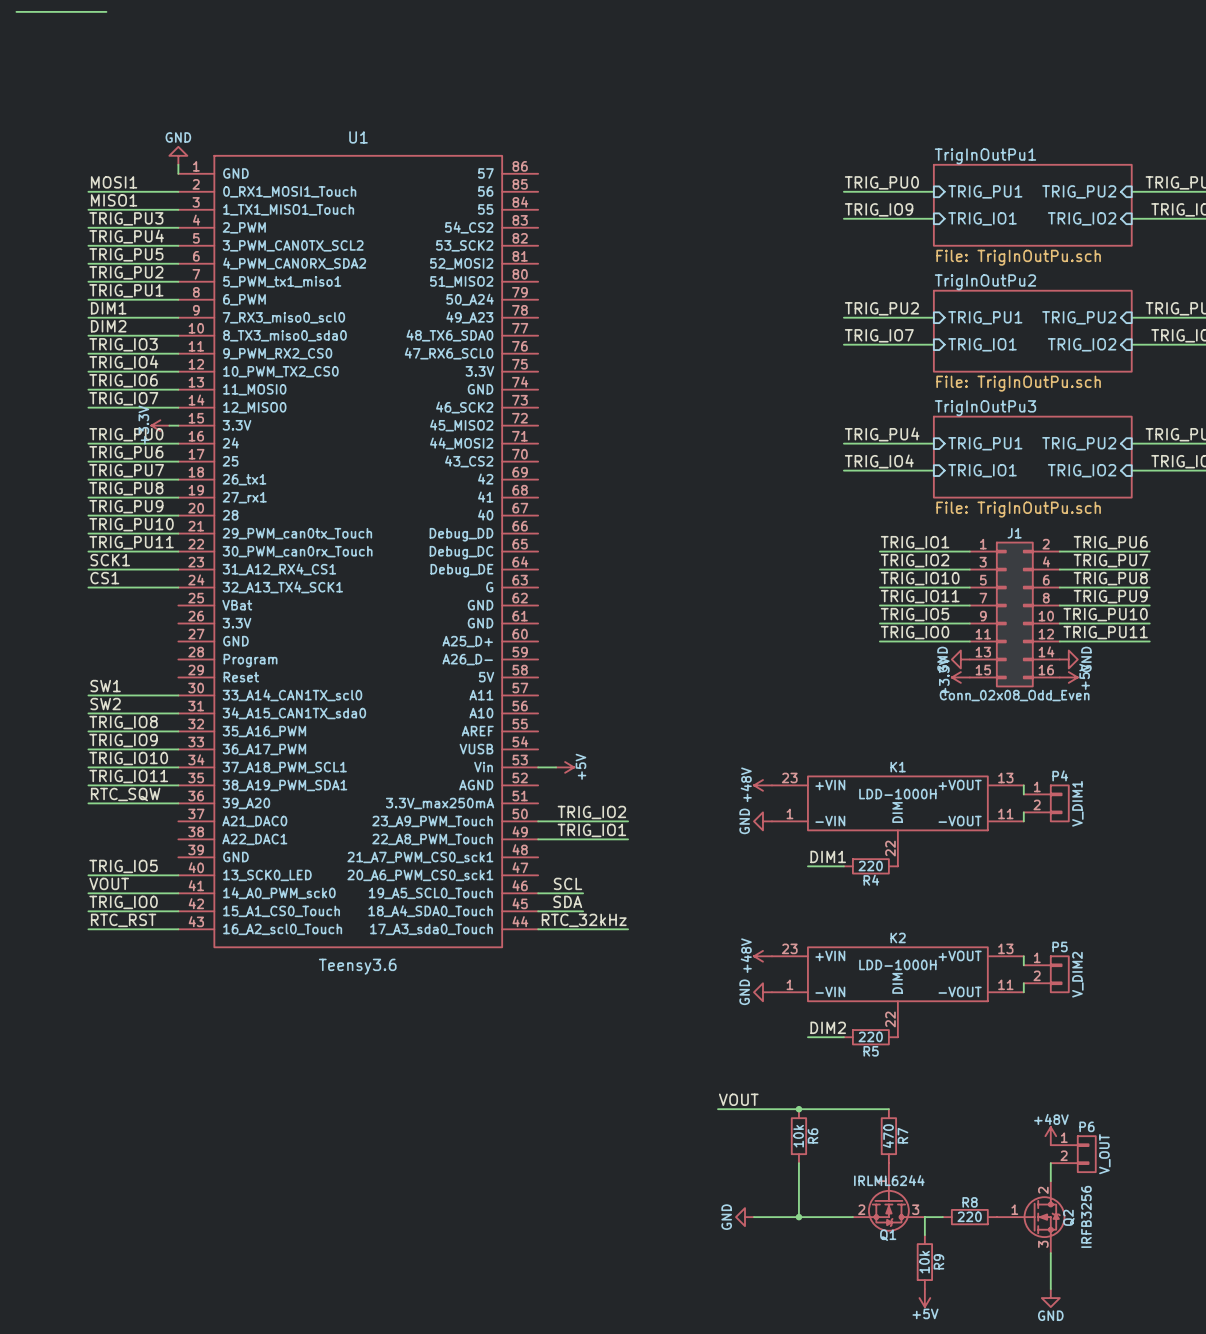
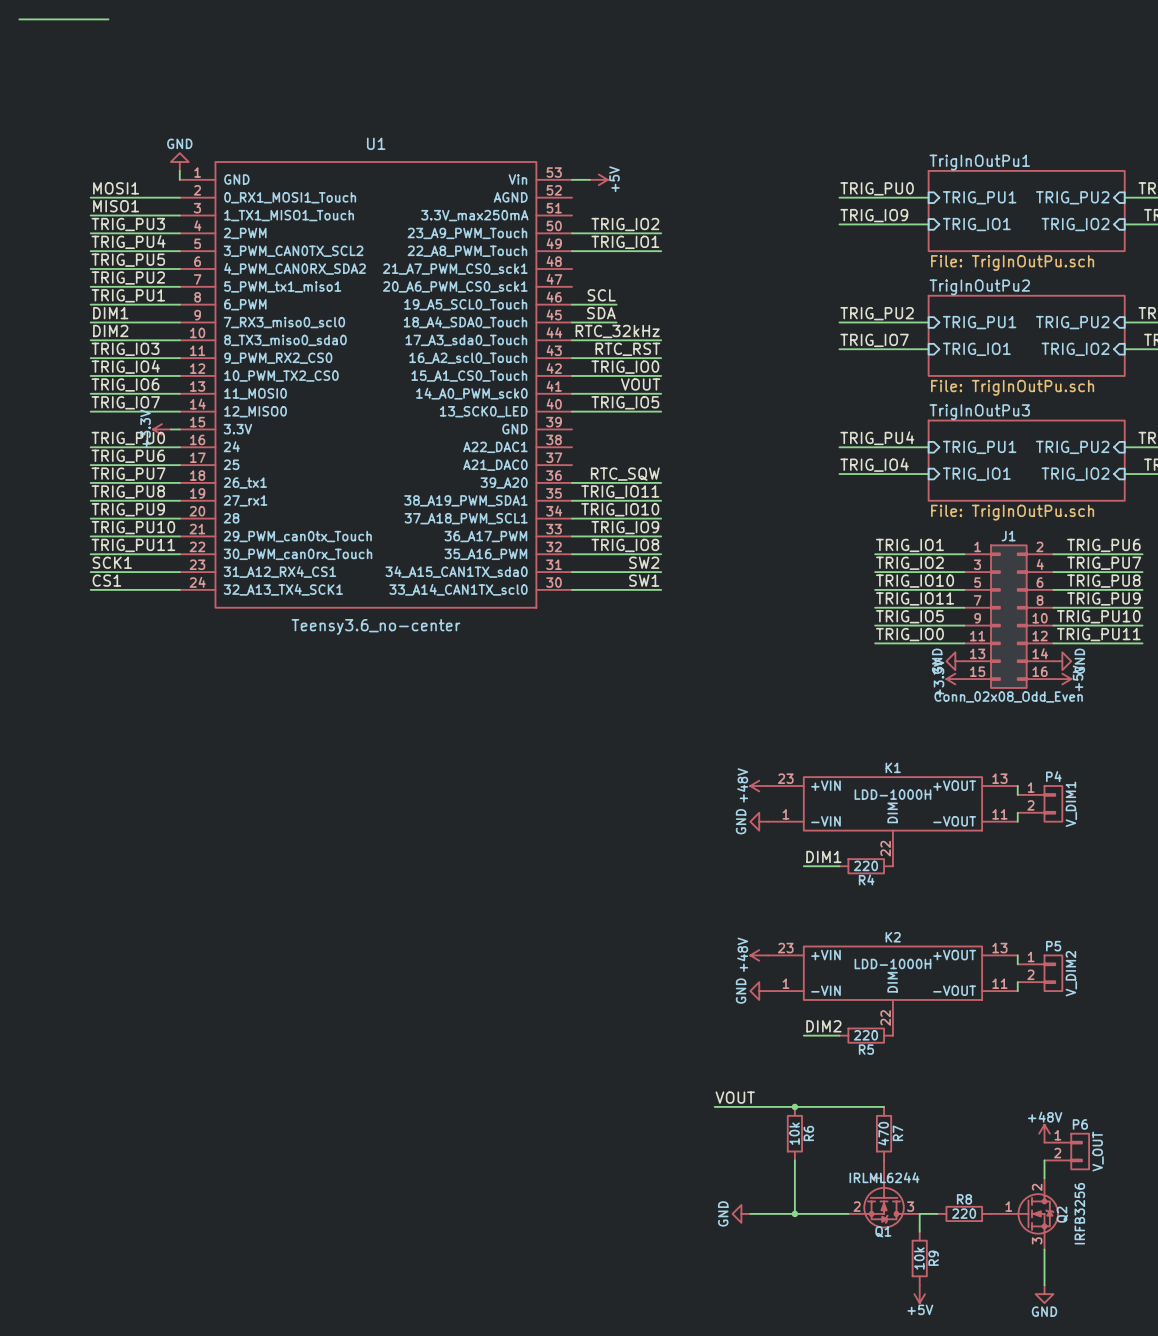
U1 name position: U1 (358, 137) -> U1 (376, 143)
U1 symbol: [178, 155, 539, 948] -> [179, 162, 573, 608]
wire: none -> (572, 179) (589, 179)
power symbol: none -> +5V (598, 179)
label: none -> TRIG_IO2 (625, 224)
wire: none -> (572, 233) (661, 233)
label: none -> TRIG_IO1 (625, 242)
wire: none -> (572, 251) (661, 251)
label: none -> SCL (601, 295)
wire: none -> (572, 304) (616, 304)
label: none -> SDA (601, 313)
wire: none -> (572, 322) (616, 322)
label: none -> RTC_32kHz (617, 331)
wire: none -> (572, 340) (661, 340)
label: none -> RTC_RST (627, 349)
wire: none -> (572, 358) (661, 358)
label: none -> TRIG_IO0 (625, 367)
wire: none -> (572, 375) (661, 375)
label: none -> VOUT (640, 384)
wire: none -> (572, 393) (661, 393)
label: none -> TRIG_IO5 (625, 402)
wire: none -> (572, 411) (661, 411)
label: none -> RTC_SQW (625, 474)
wire: none -> (572, 482) (661, 482)
label: none -> TRIG_IO11 (620, 491)
wire: none -> (572, 500) (661, 500)
label: none -> TRIG_IO10 (620, 509)
wire: none -> (572, 518) (661, 518)
label: none -> TRIG_IO9 (625, 527)
wire: none -> (572, 536) (661, 536)
label: none -> TRIG_IO8 (625, 545)
wire: none -> (572, 554) (661, 554)
label: none -> SW2 (644, 562)
wire: none -> (572, 572) (661, 572)
label: none -> SW1 (644, 580)
wire: none -> (572, 589) (661, 589)
label: SW1 (105, 686) -> none
wire: (88, 695) (178, 695) -> none
label: SW2 (105, 704) -> none
wire: (88, 713) (178, 713) -> none
label: TRIG_IO8 (123, 722) -> none
wire: (88, 731) (178, 731) -> none
label: TRIG_IO9 (123, 740) -> none
wire: (88, 749) (178, 749) -> none
label: TRIG_IO10 (128, 758) -> none
wire: (88, 767) (178, 767) -> none
wire: (538, 767) (556, 767) -> none
power symbol: +5V (565, 767) -> none
label: TRIG_IO11 (128, 776) -> none
wire: (88, 785) (178, 785) -> none
label: RTC_SQW (125, 794) -> none
wire: (88, 803) (178, 803) -> none
label: TRIG_IO2 (591, 812) -> none
wire: (538, 821) (628, 821) -> none
label: TRIG_IO1 (591, 830) -> none
wire: (538, 839) (628, 839) -> none
label: TRIG_IO5 (123, 866) -> none
wire: (88, 875) (178, 875) -> none
label: VOUT (109, 883) -> none
label: SCL (568, 883) -> none
wire: (88, 893) (178, 893) -> none
wire: (538, 893) (583, 893) -> none
label: SDA (567, 901) -> none
label: TRIG_IO0 (123, 902) -> none
wire: (88, 911) (178, 911) -> none
wire: (538, 911) (583, 911) -> none
label: RTC_RST (123, 920) -> none
label: RTC_32kHz (584, 920) -> none
wire: (88, 929) (178, 929) -> none
wire: (538, 929) (628, 929) -> none
U1 value: Teensy3.6 (357, 966) -> Teensy3.6_no-center (375, 626)

